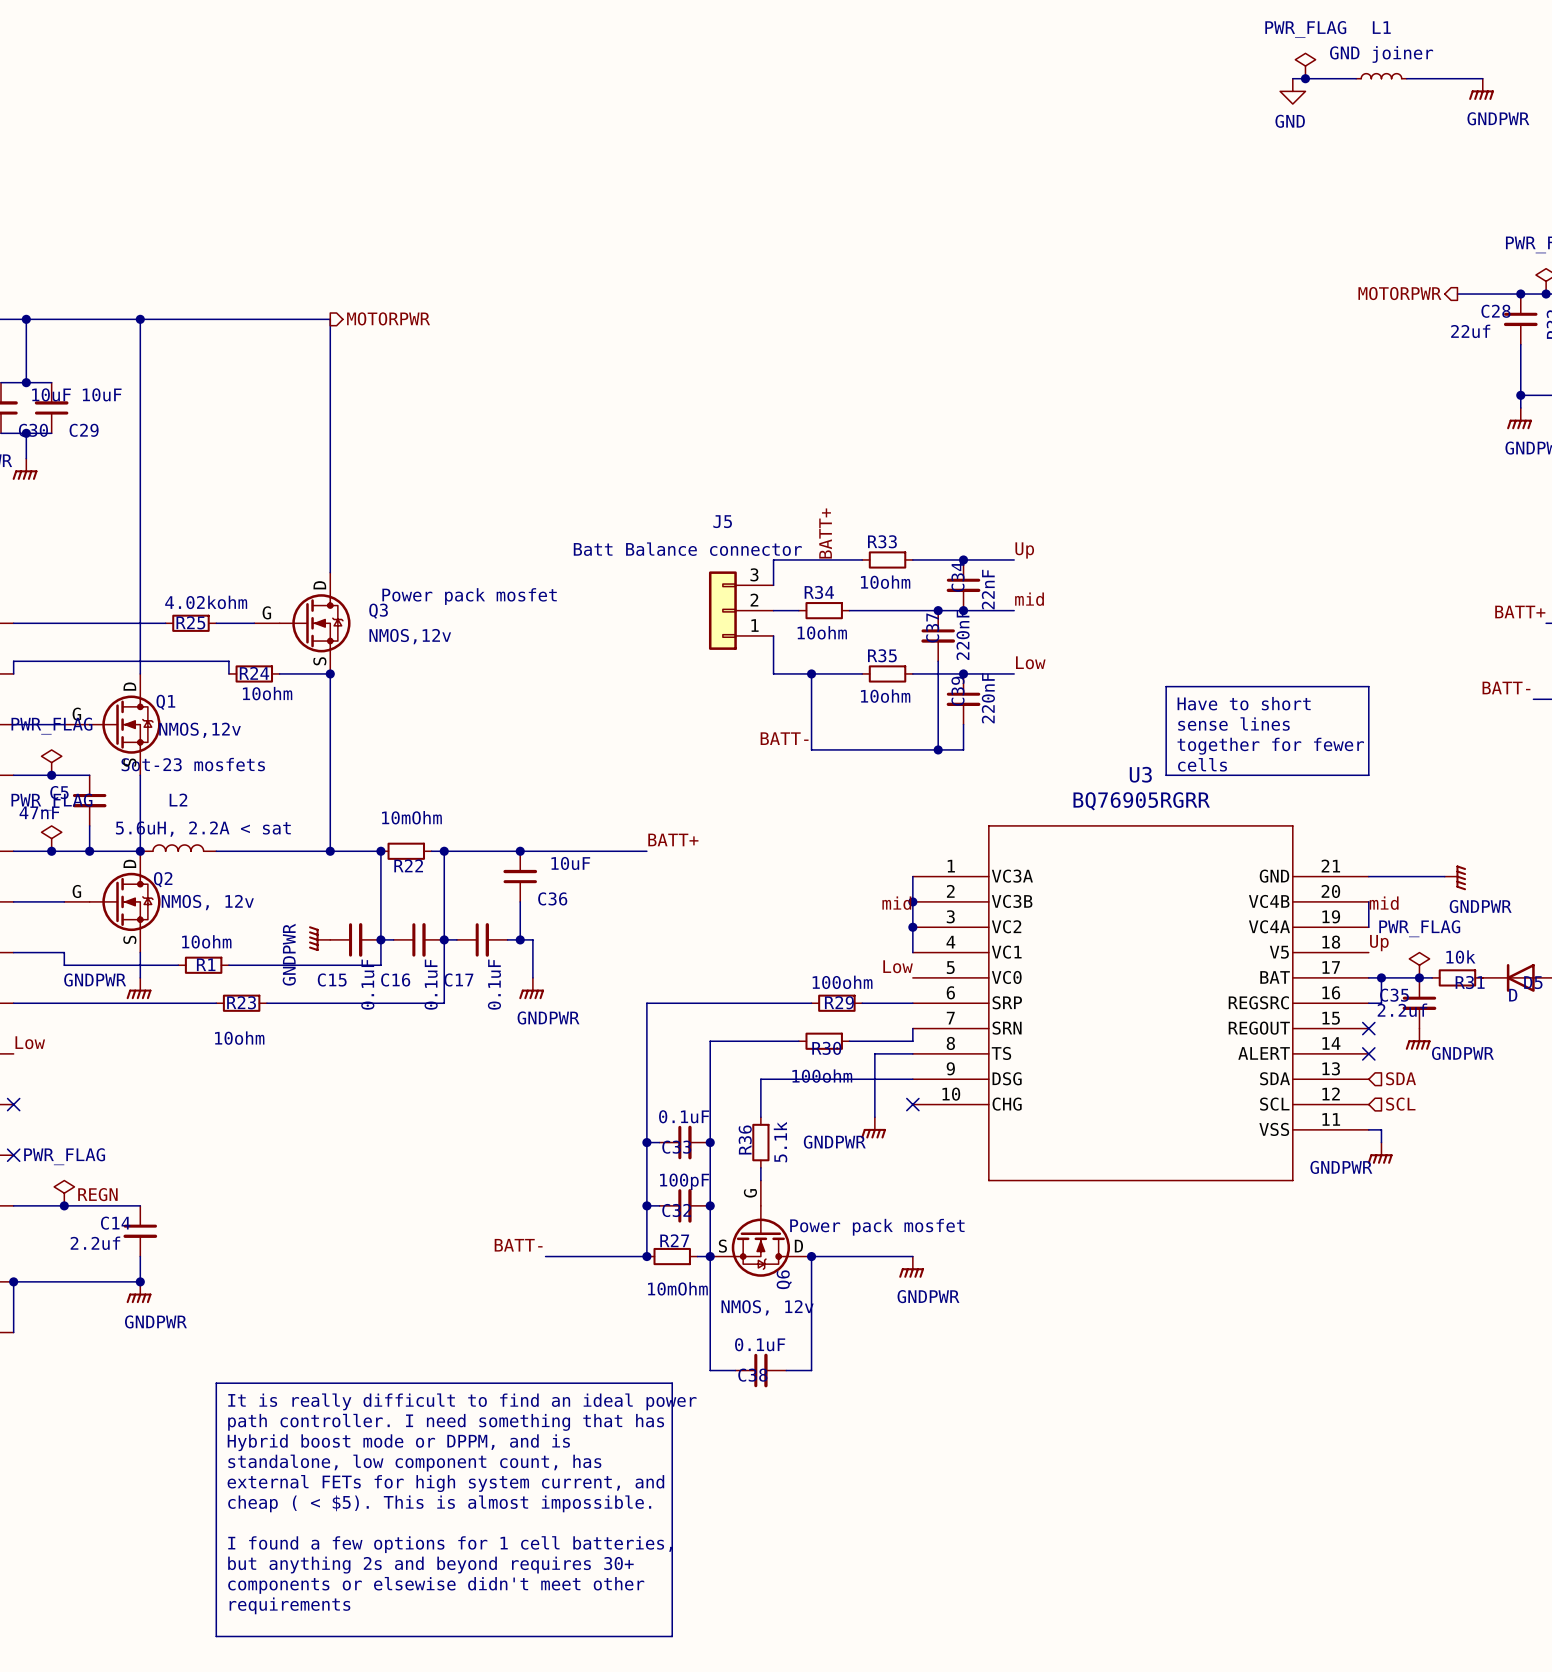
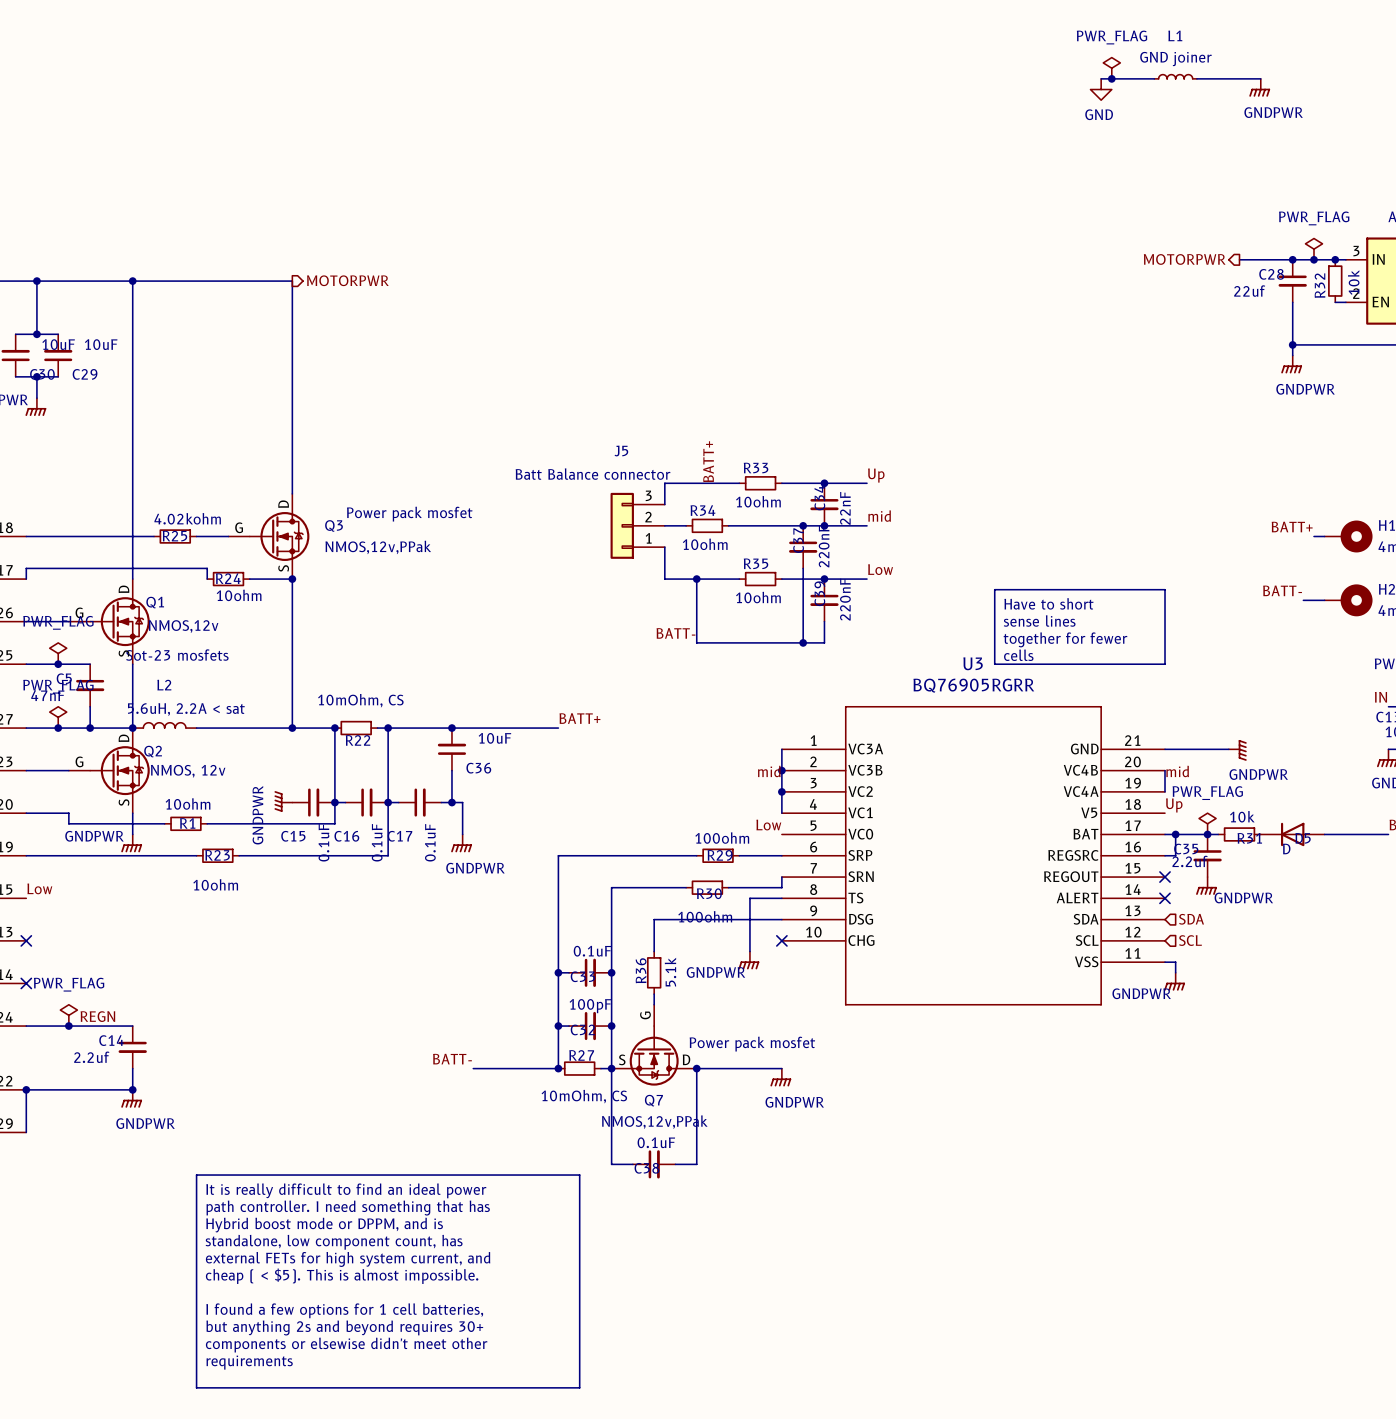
Q3 value: NMOS,12v (410, 636) -> NMOS,12v,PPak (378, 547)
R22 value: 10mOhm (411, 817) -> 10mOhm, CS (360, 700)
Q6 name: Q6 (784, 1279) -> Q7 (653, 1100)
R27 value: 10mOhm (677, 1288) -> 10mOhm, CS (584, 1096)
Q6 value: NMOS, 12v (767, 1307) -> NMOS,12v,PPak (654, 1122)

